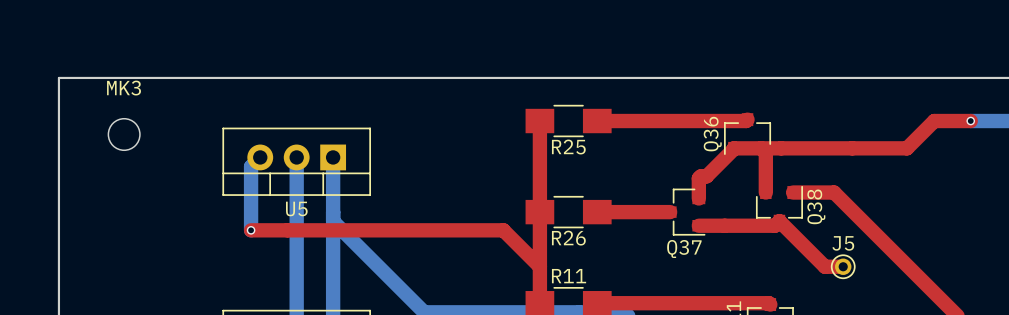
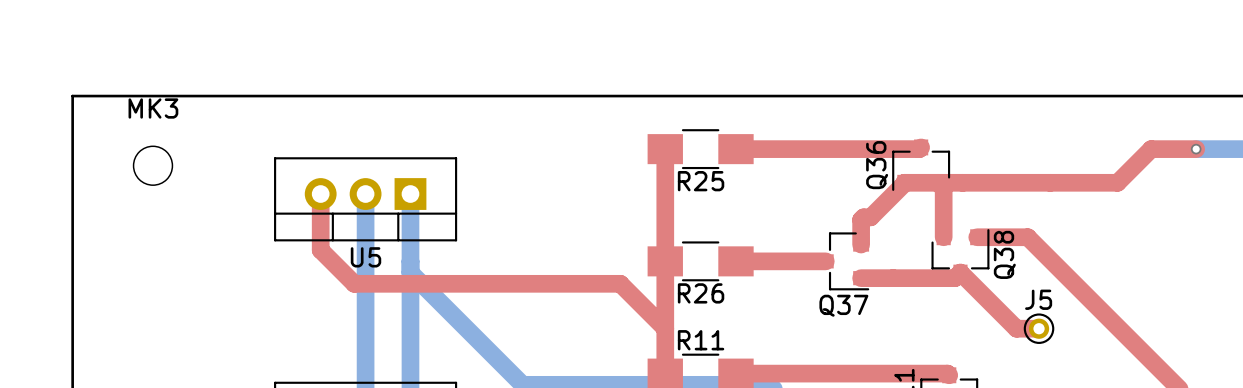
bottom track: (260, 157) (251, 166) (251, 230) -> none
top track: (251, 230) (287, 230) -> (320, 194) (320, 250) (354, 283)
via: (251, 230) -> none

